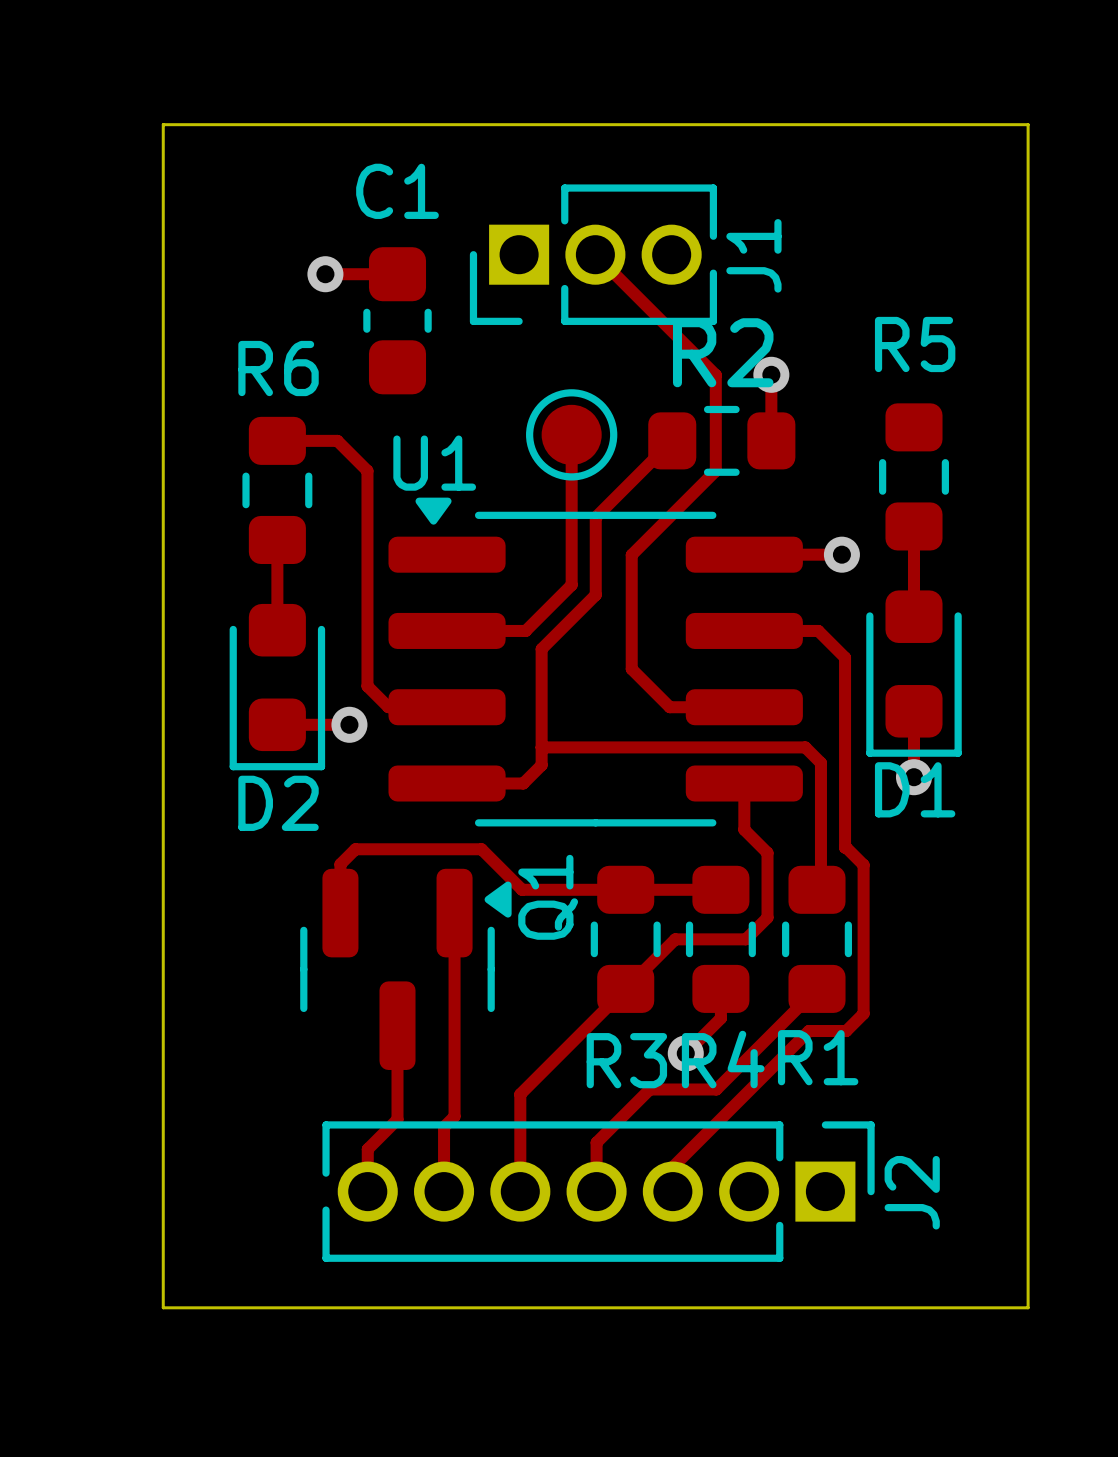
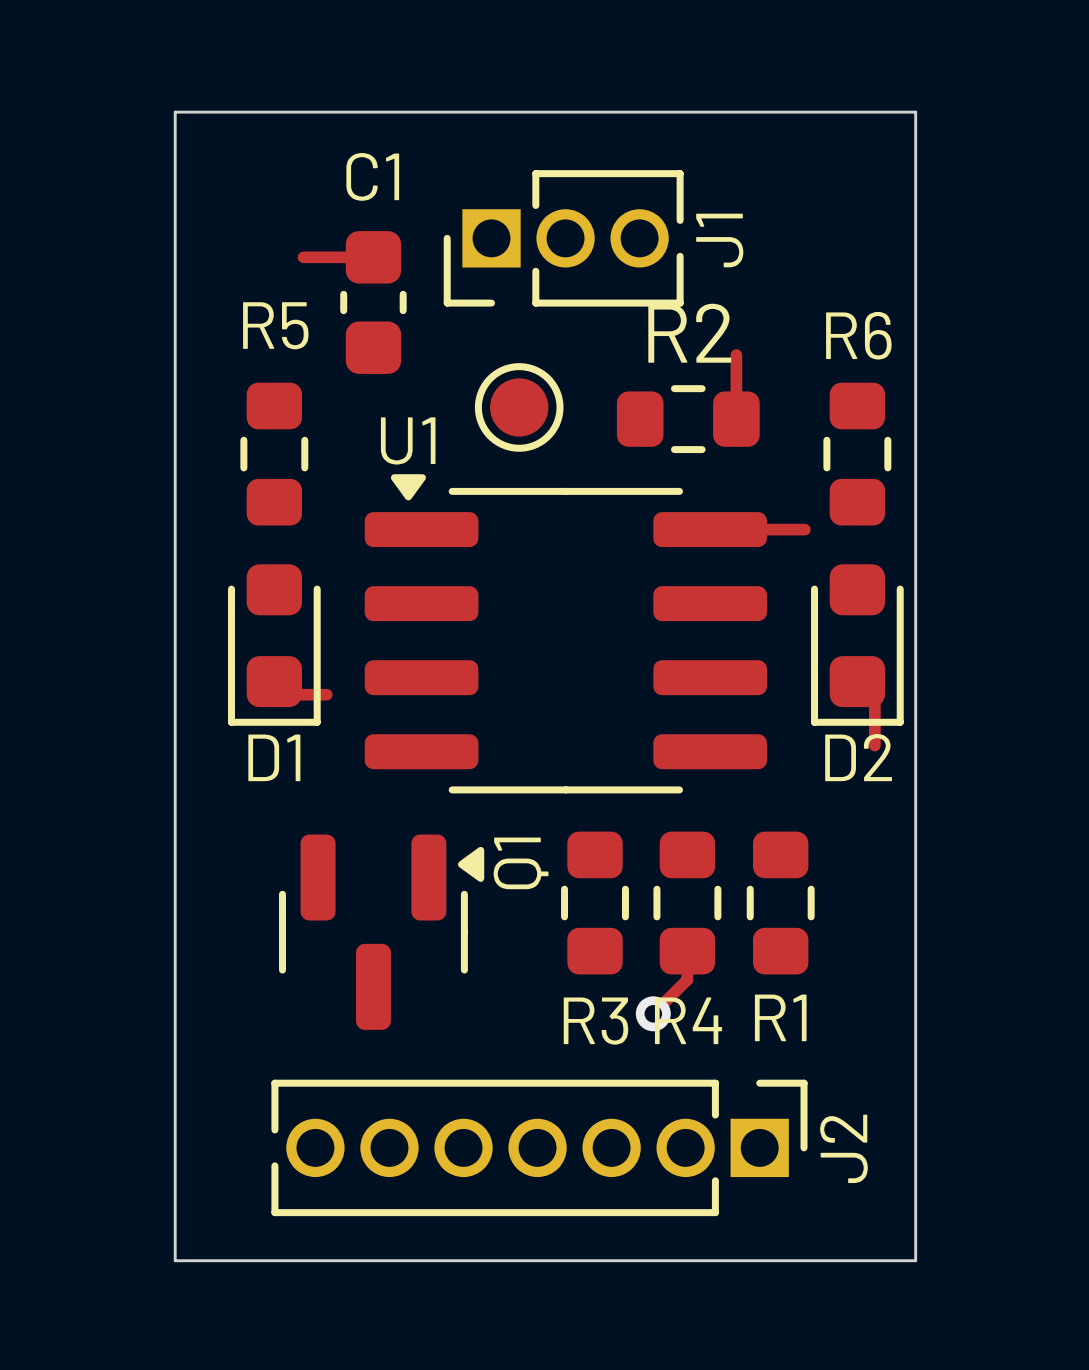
board edge: (193, 124) (163, 124) (163, 1307) (193, 1307) -> (175, 112) (175, 1260)
board edge: (956, 124) (1028, 124) (1028, 1307) (956, 1307) -> (915, 112) (915, 1260)
track: (595, 254) (715, 375) (715, 470) (631, 554) (631, 669) (669, 707) (744, 707) -> none
via: (325, 274) -> none
via: (771, 374) -> none
track: (571, 434) (571, 585) (525, 630) (447, 630) -> none
part position: (571, 434) -> (519, 407)
track: (277, 440) (337, 440) (367, 470) (367, 686) (388, 707) (447, 707) -> none
track: (672, 440) (595, 517) (595, 594) (541, 649) (541, 765) (523, 783) (447, 783) -> none
R5 position: (913, 476) -> (274, 454)
R6 position: (277, 490) -> (857, 454)
track: (913, 526) (913, 616) -> none
track: (277, 539) (277, 630) -> none
via: (841, 554) -> none
track: (744, 630) (818, 630) (845, 657) (845, 847) (863, 865) (863, 1013) (846, 1031) (808, 1031) (672, 1167) (672, 1191) -> none
D1 position: (913, 673) -> (274, 645)
D2 position: (277, 687) -> (857, 645)
via: (349, 724) -> none
track: (541, 747) (805, 747) (820, 763) (820, 885) (817, 889) -> none
via: (913, 777) -> none
track: (744, 783) (744, 829) (767, 852) (767, 917) (745, 939) (675, 939) (520, 1094) (520, 1191) -> none
track: (720, 889) (522, 889) (481, 849) (355, 849) (340, 864) (340, 913) -> none
track: (454, 913) (454, 1116) (444, 1127) (444, 1191) -> none
track: (817, 988) (716, 1089) (649, 1089) (596, 1142) (596, 1191) -> none
track: (397, 1025) (397, 1119) (367, 1149) (367, 1191) -> none
J2 position: (598, 1191) -> (539, 1147)

